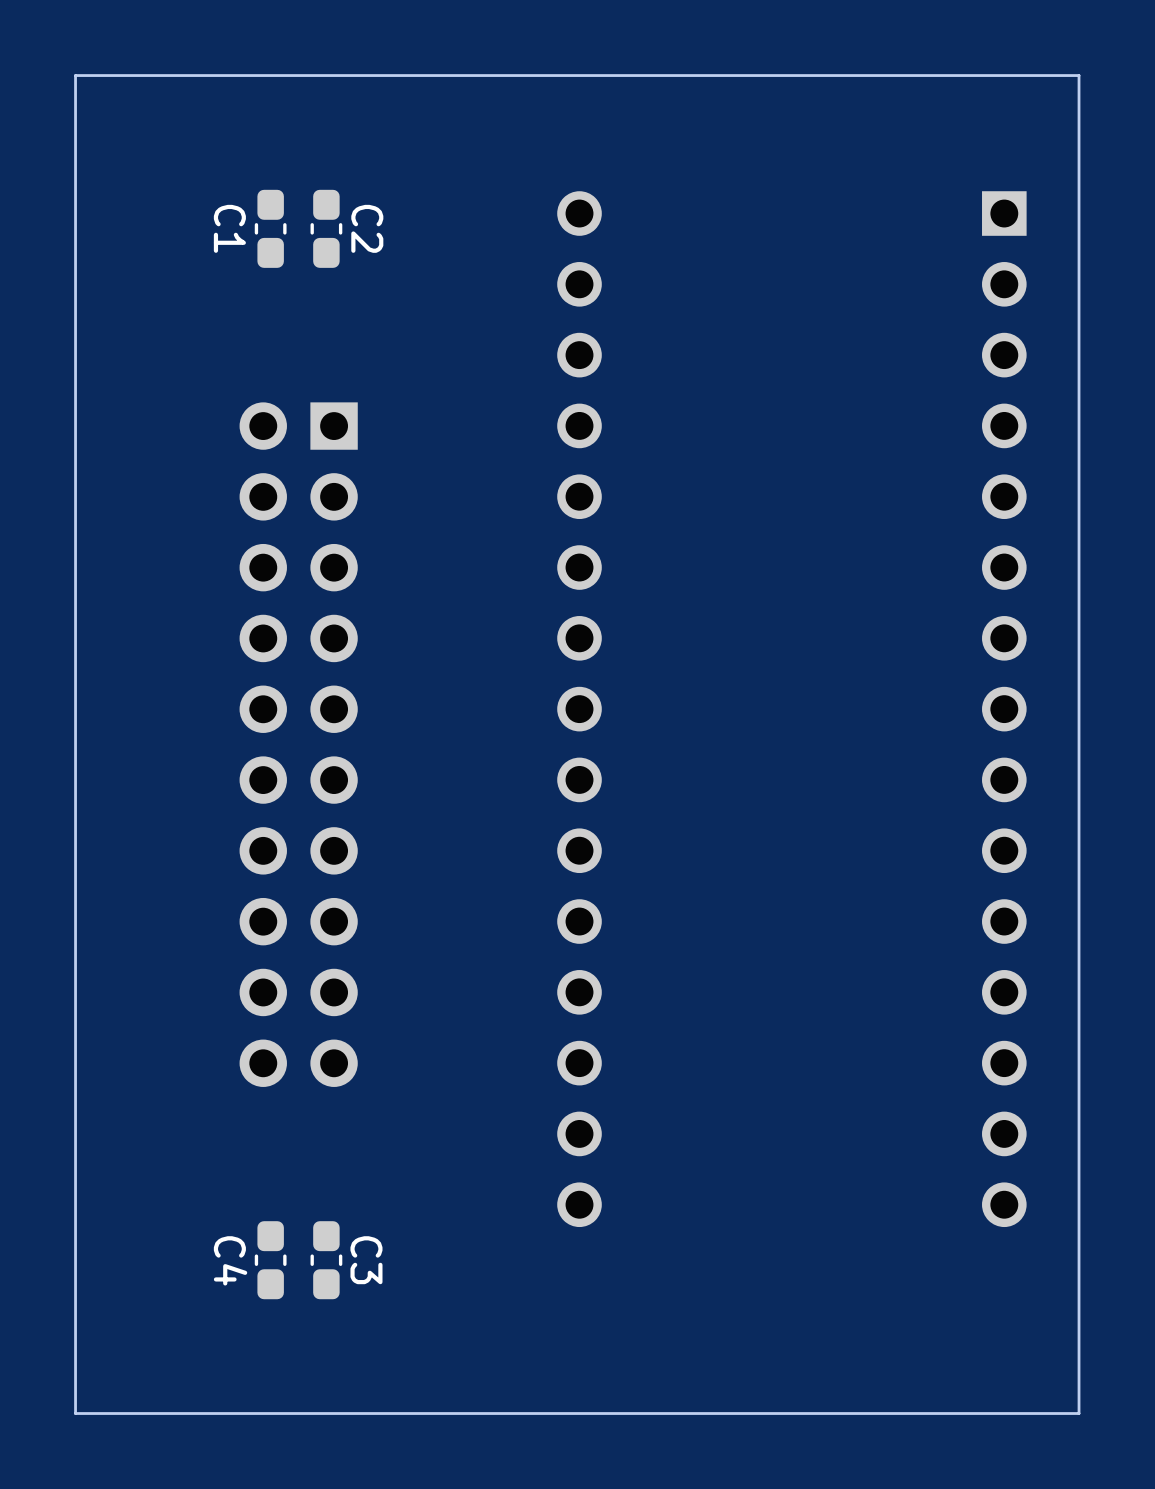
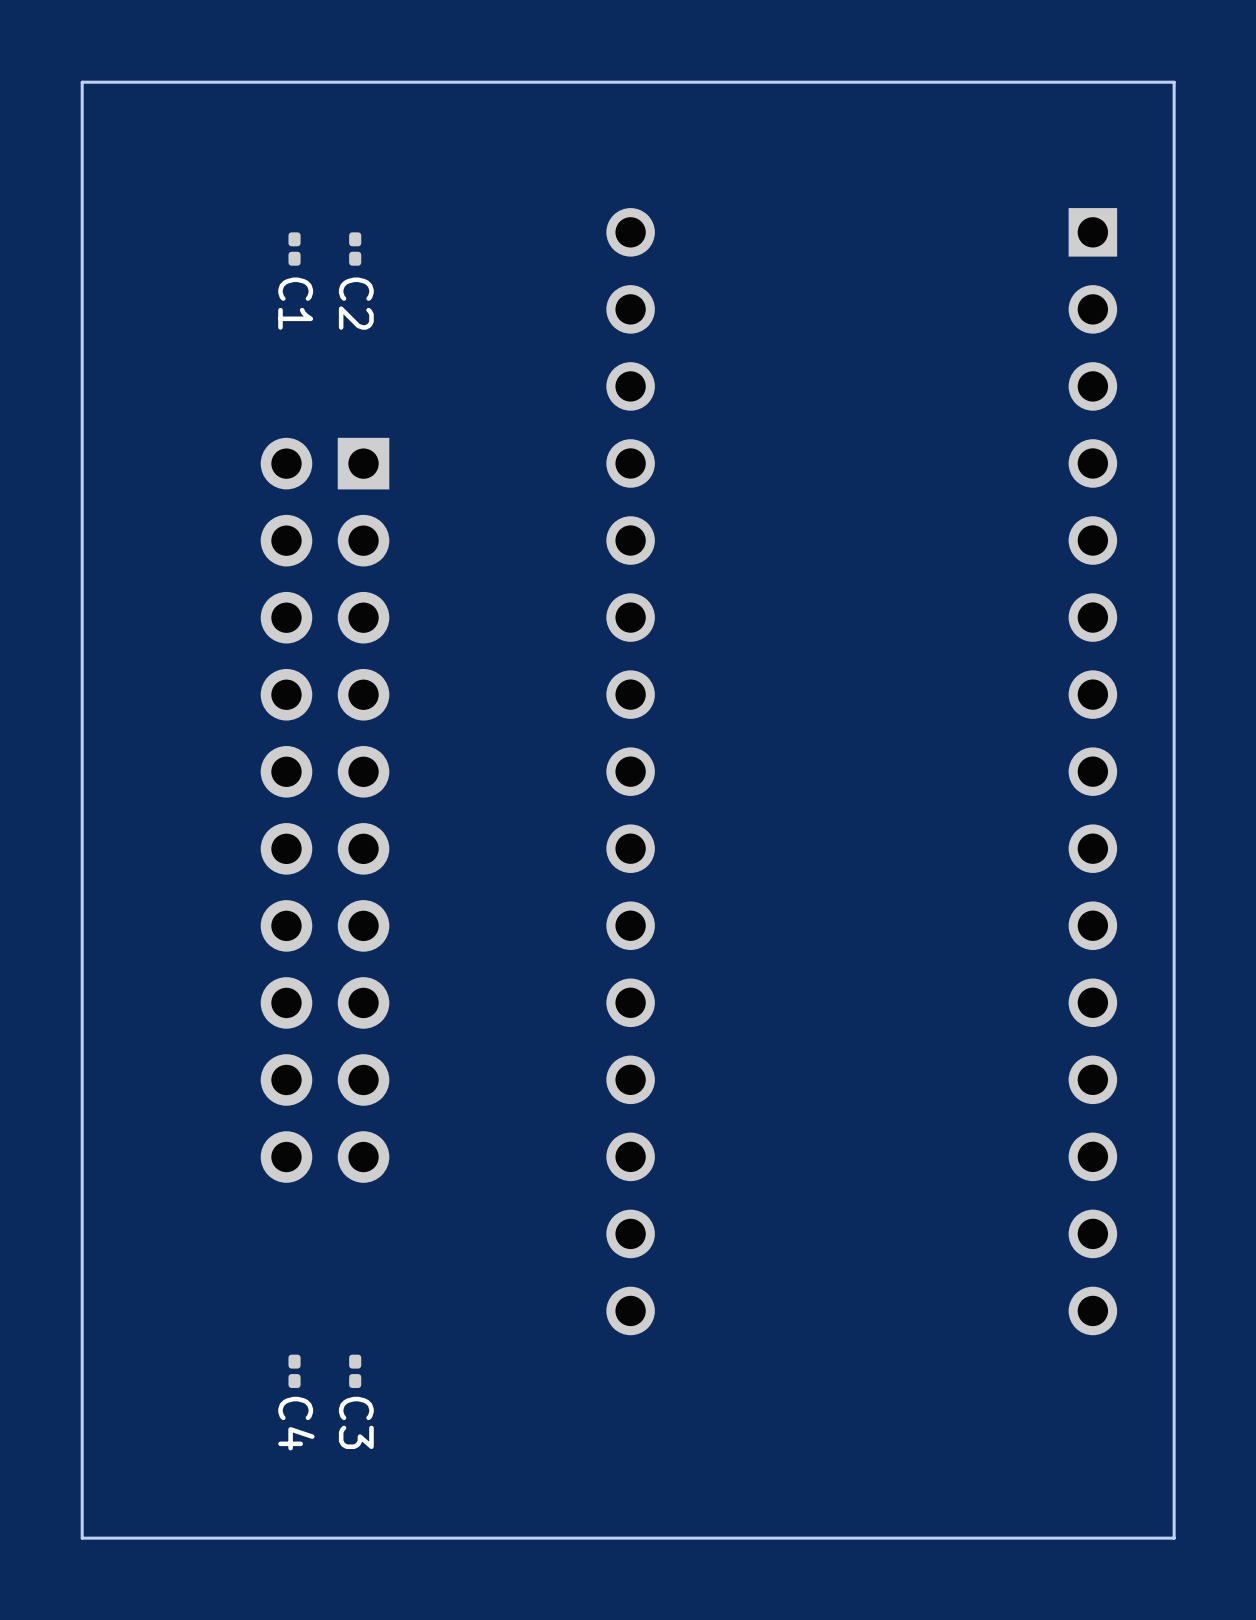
C1 footprint: [254, 189, 287, 268] -> [288, 232, 301, 266]
C2 footprint: [310, 189, 343, 268] -> [349, 232, 362, 266]
C1 name position: C1 (229, 228) -> C1 (295, 303)
C2 name position: C2 (367, 228) -> C2 (356, 303)
C4 footprint: [254, 1221, 287, 1300] -> [288, 1354, 301, 1389]
C3 footprint: [310, 1221, 343, 1300] -> [349, 1354, 362, 1389]
C4 name position: C4 (230, 1260) -> C4 (296, 1423)
C3 name position: C3 (366, 1260) -> C3 (356, 1422)

